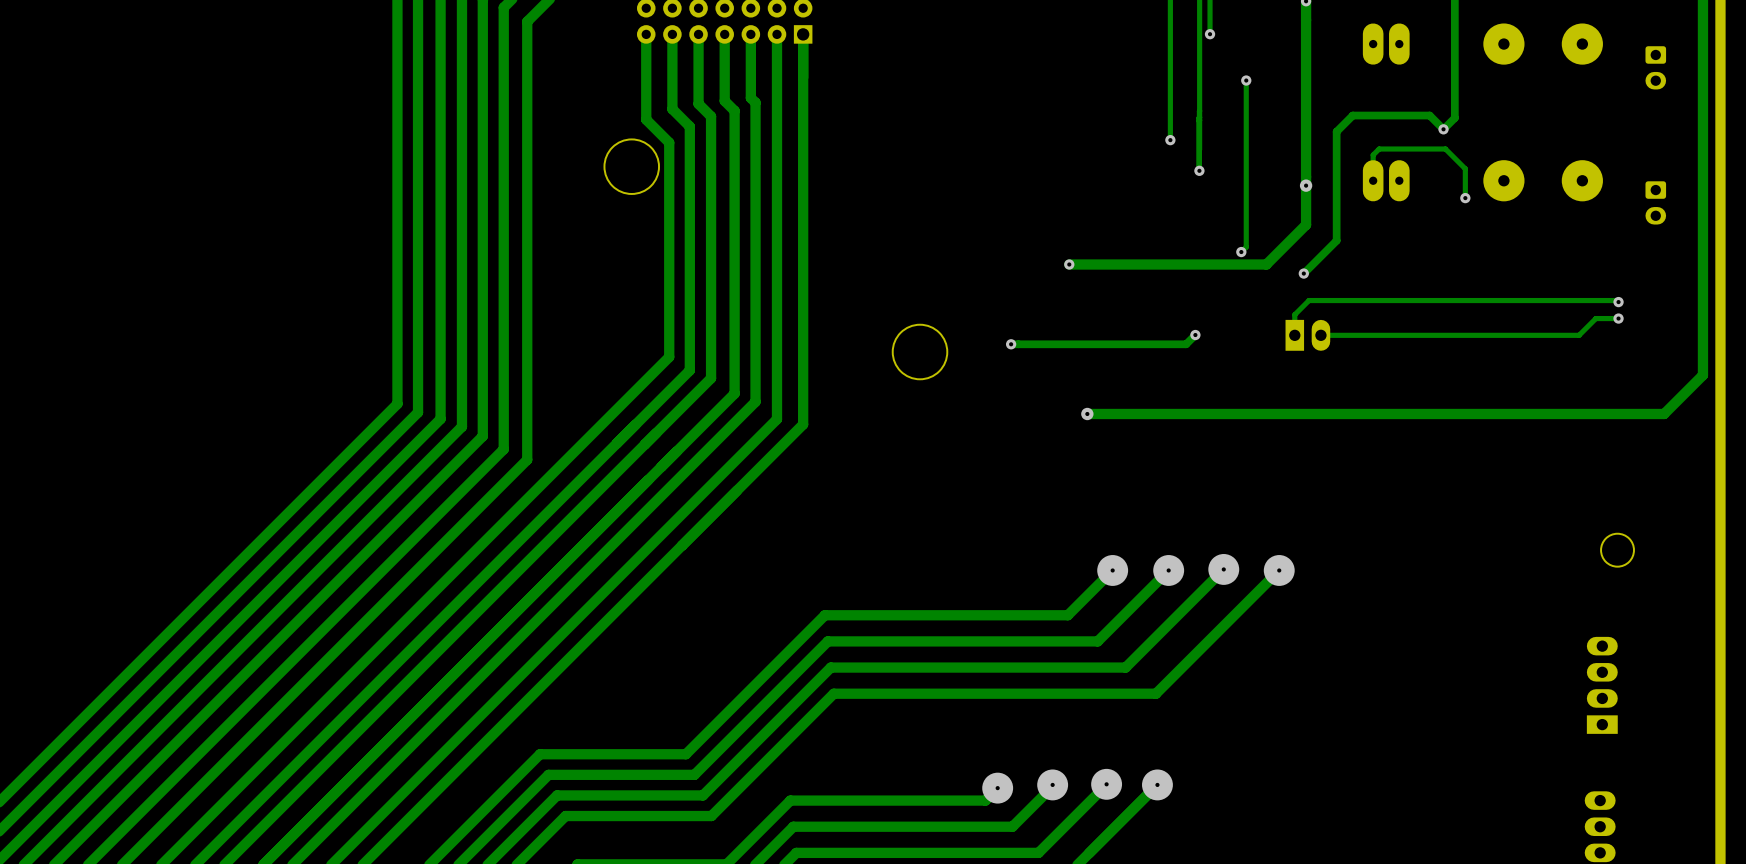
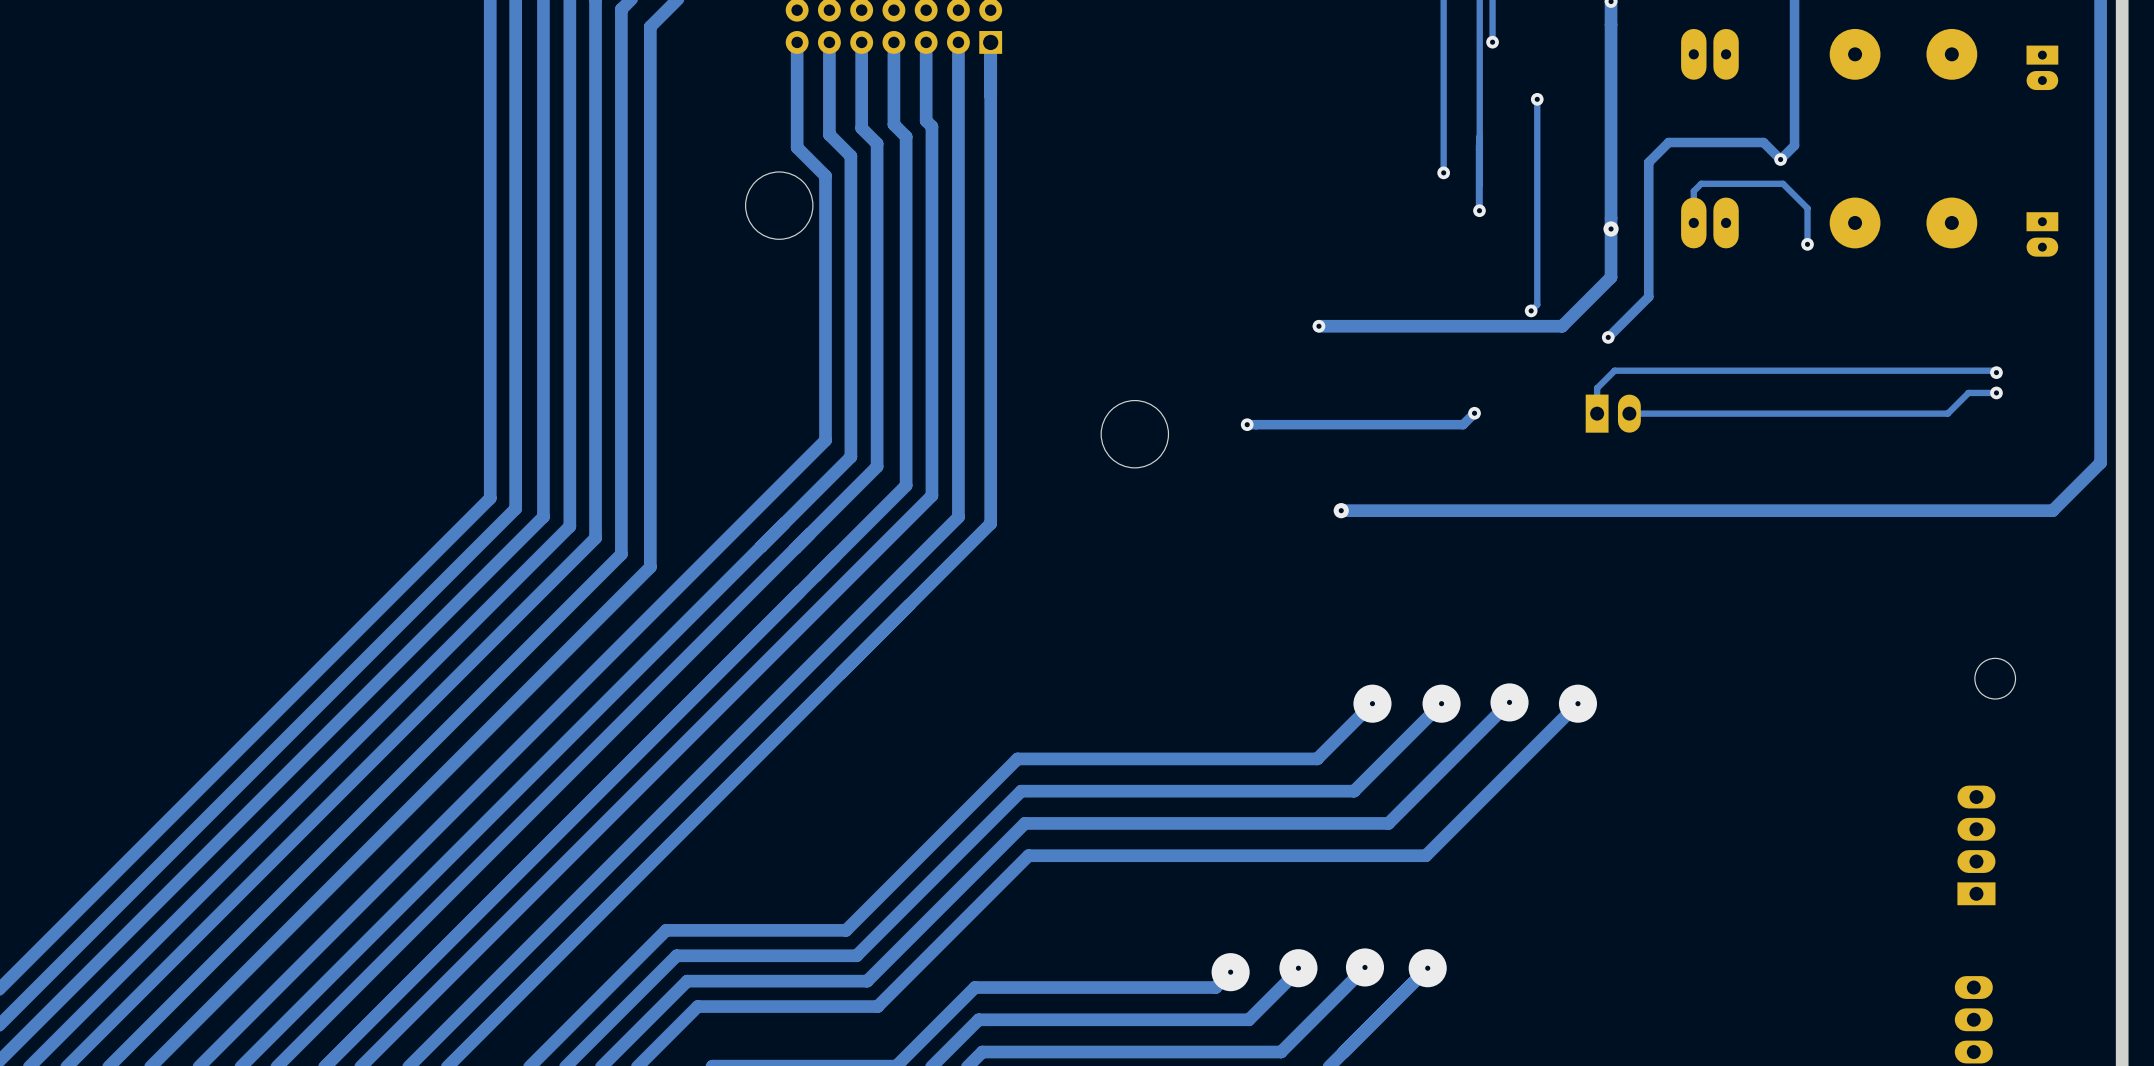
part: none -> (2042, 67)
part: (1655, 67) -> none
part: none -> (2042, 234)
part: (1655, 202) -> none

